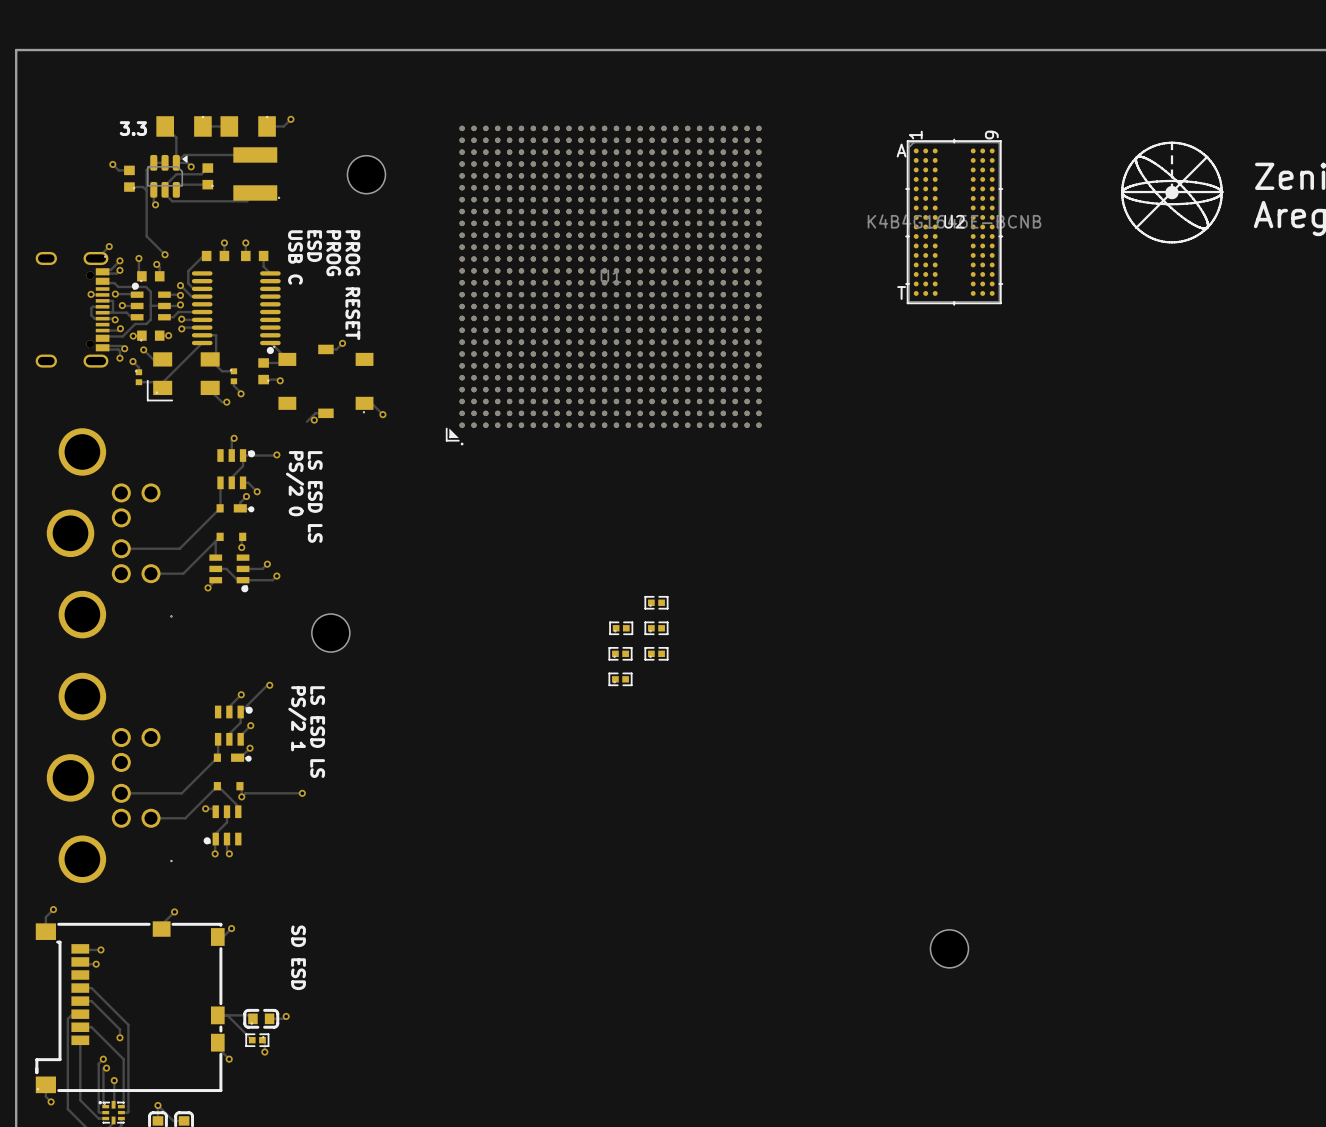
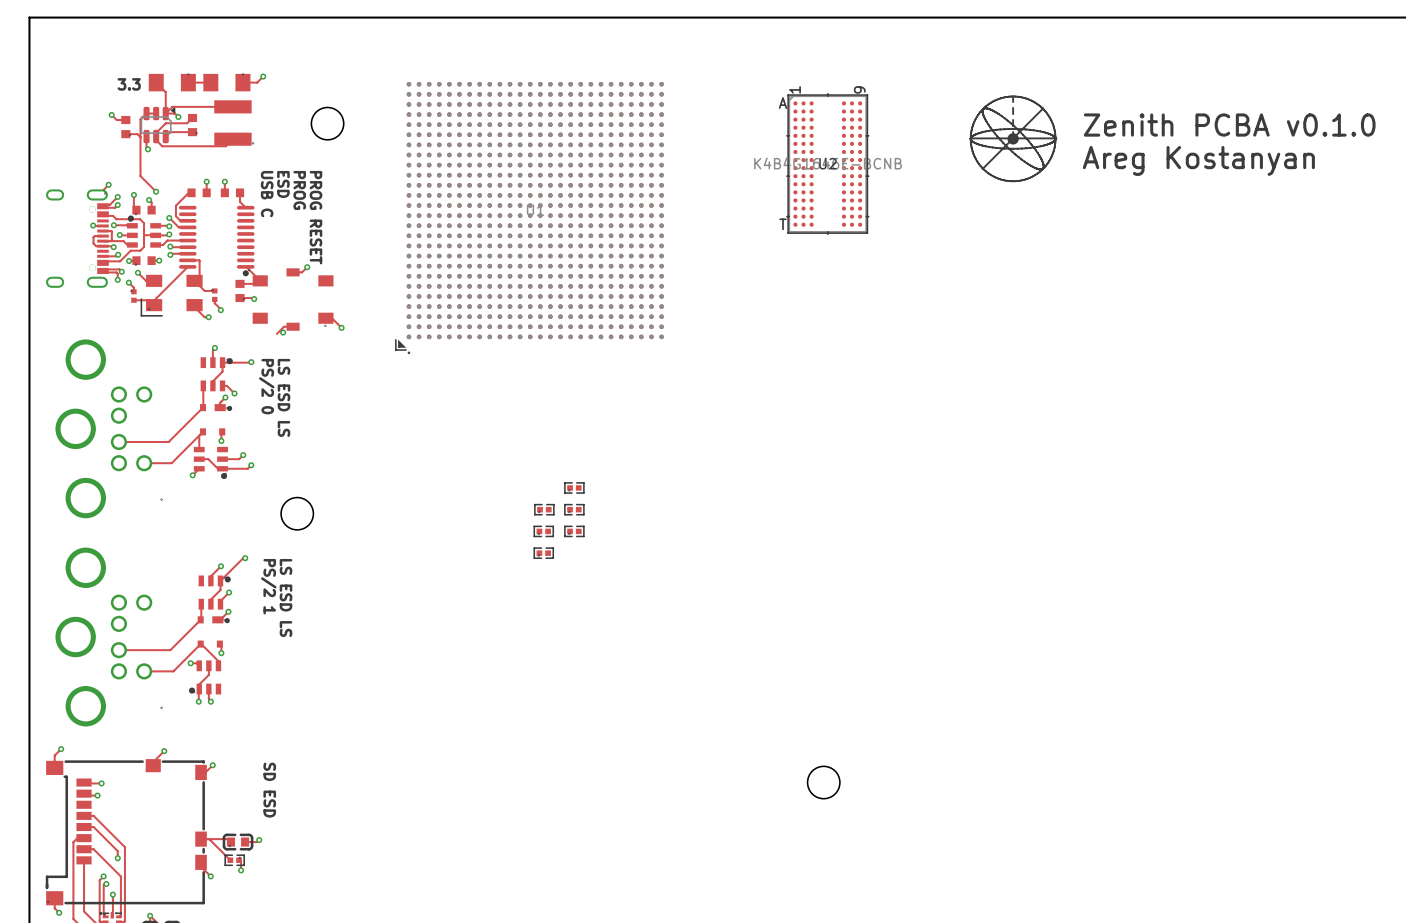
track: (302, 793) (245, 793) (241, 796) -> none
via: (302, 793) -> none

